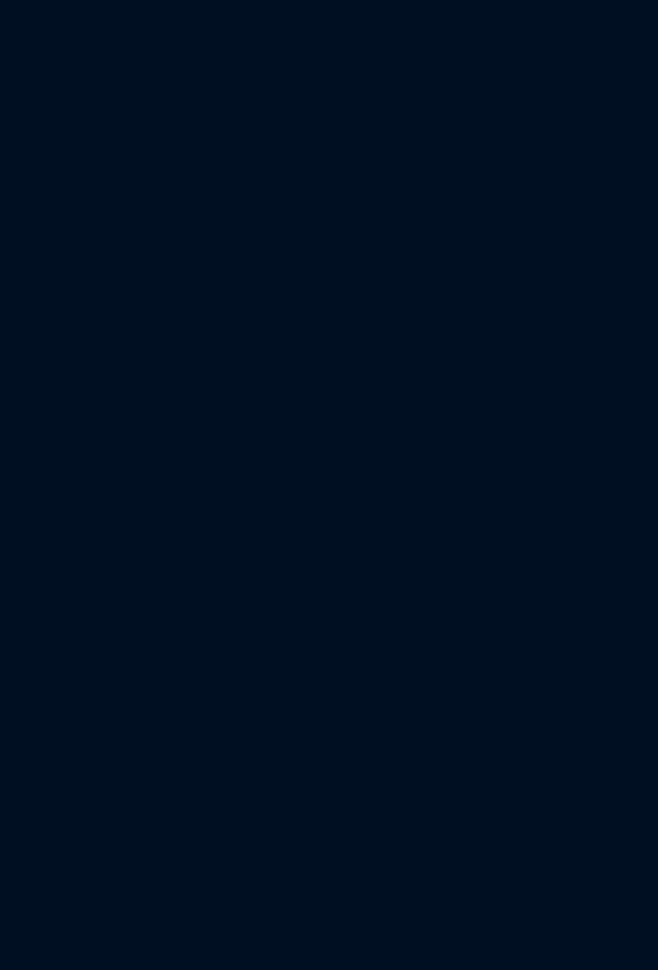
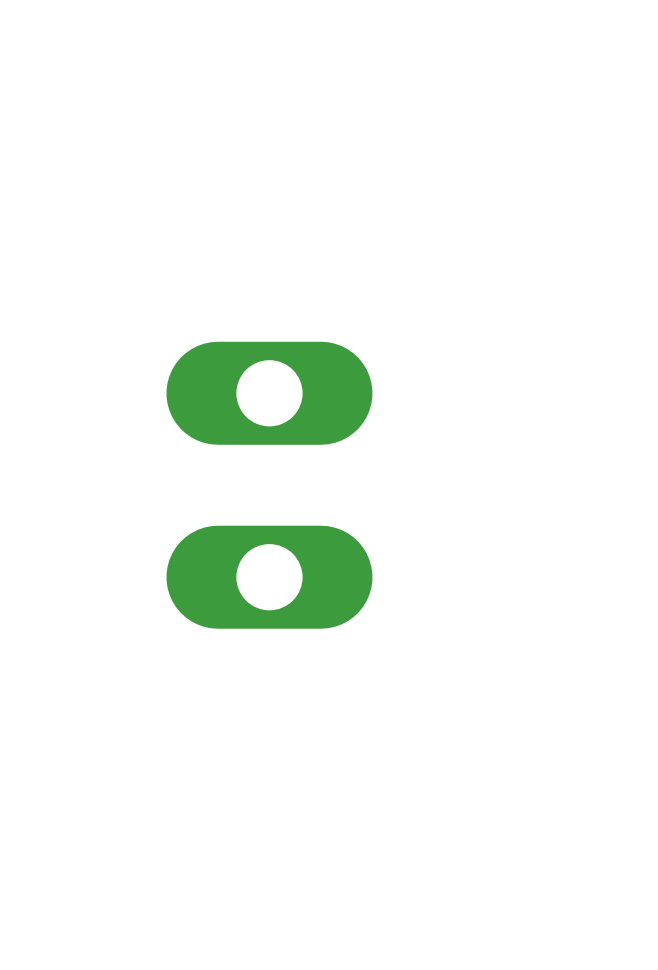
part: none -> (269, 485)

